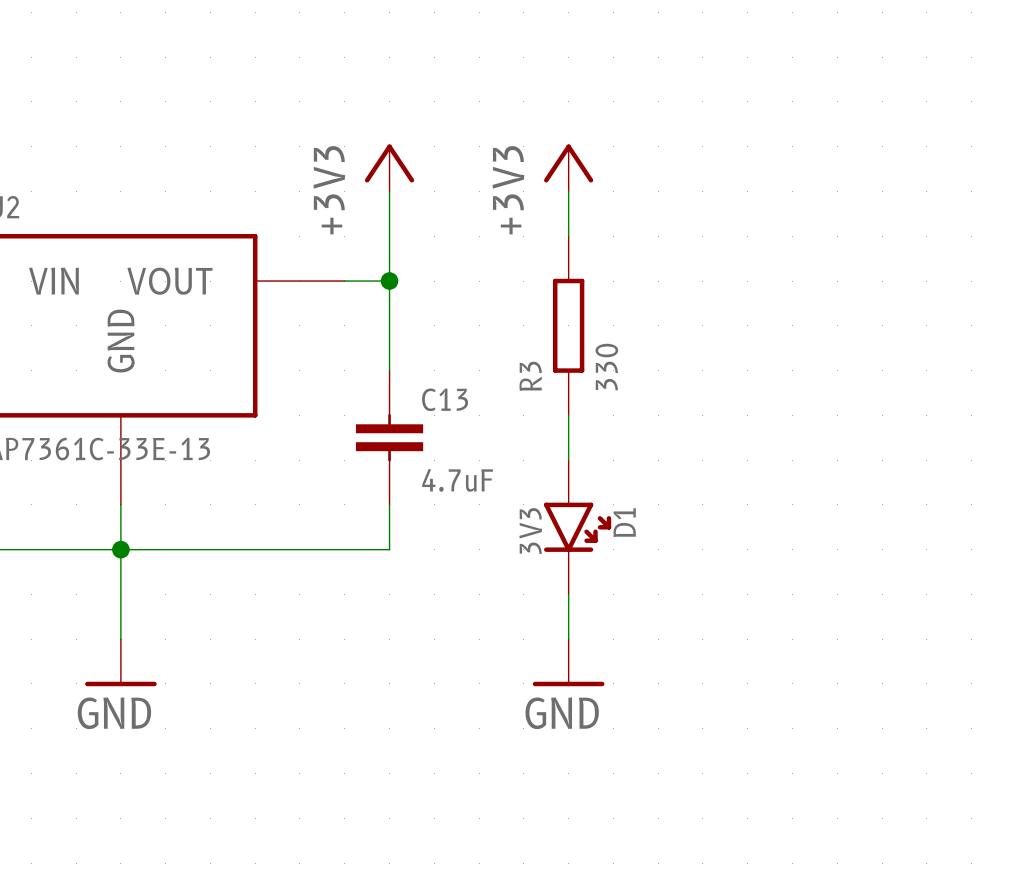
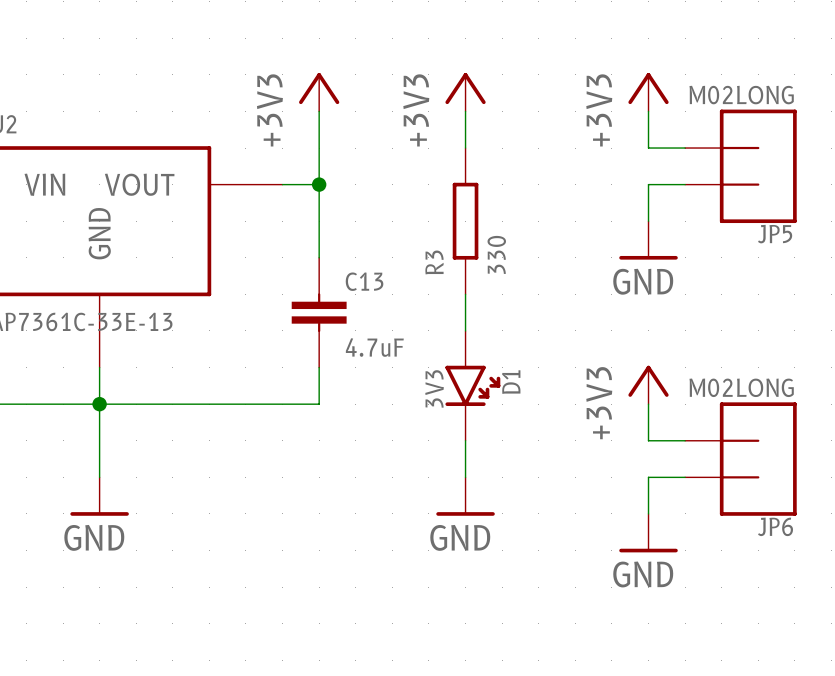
power symbol: none -> +3V3 (648, 92)
wire: none -> (648, 111) (648, 148) (685, 148)
JP5: none -> M02LONG (740, 166)
wire: none -> (685, 184) (648, 184) (648, 221)
power symbol: none -> GND (648, 240)
power symbol: none -> +3V3 (648, 384)
wire: none -> (648, 404) (648, 440) (685, 440)
JP6: none -> M02LONG (740, 459)
wire: none -> (685, 477) (648, 477) (648, 513)
power symbol: none -> GND (648, 533)

